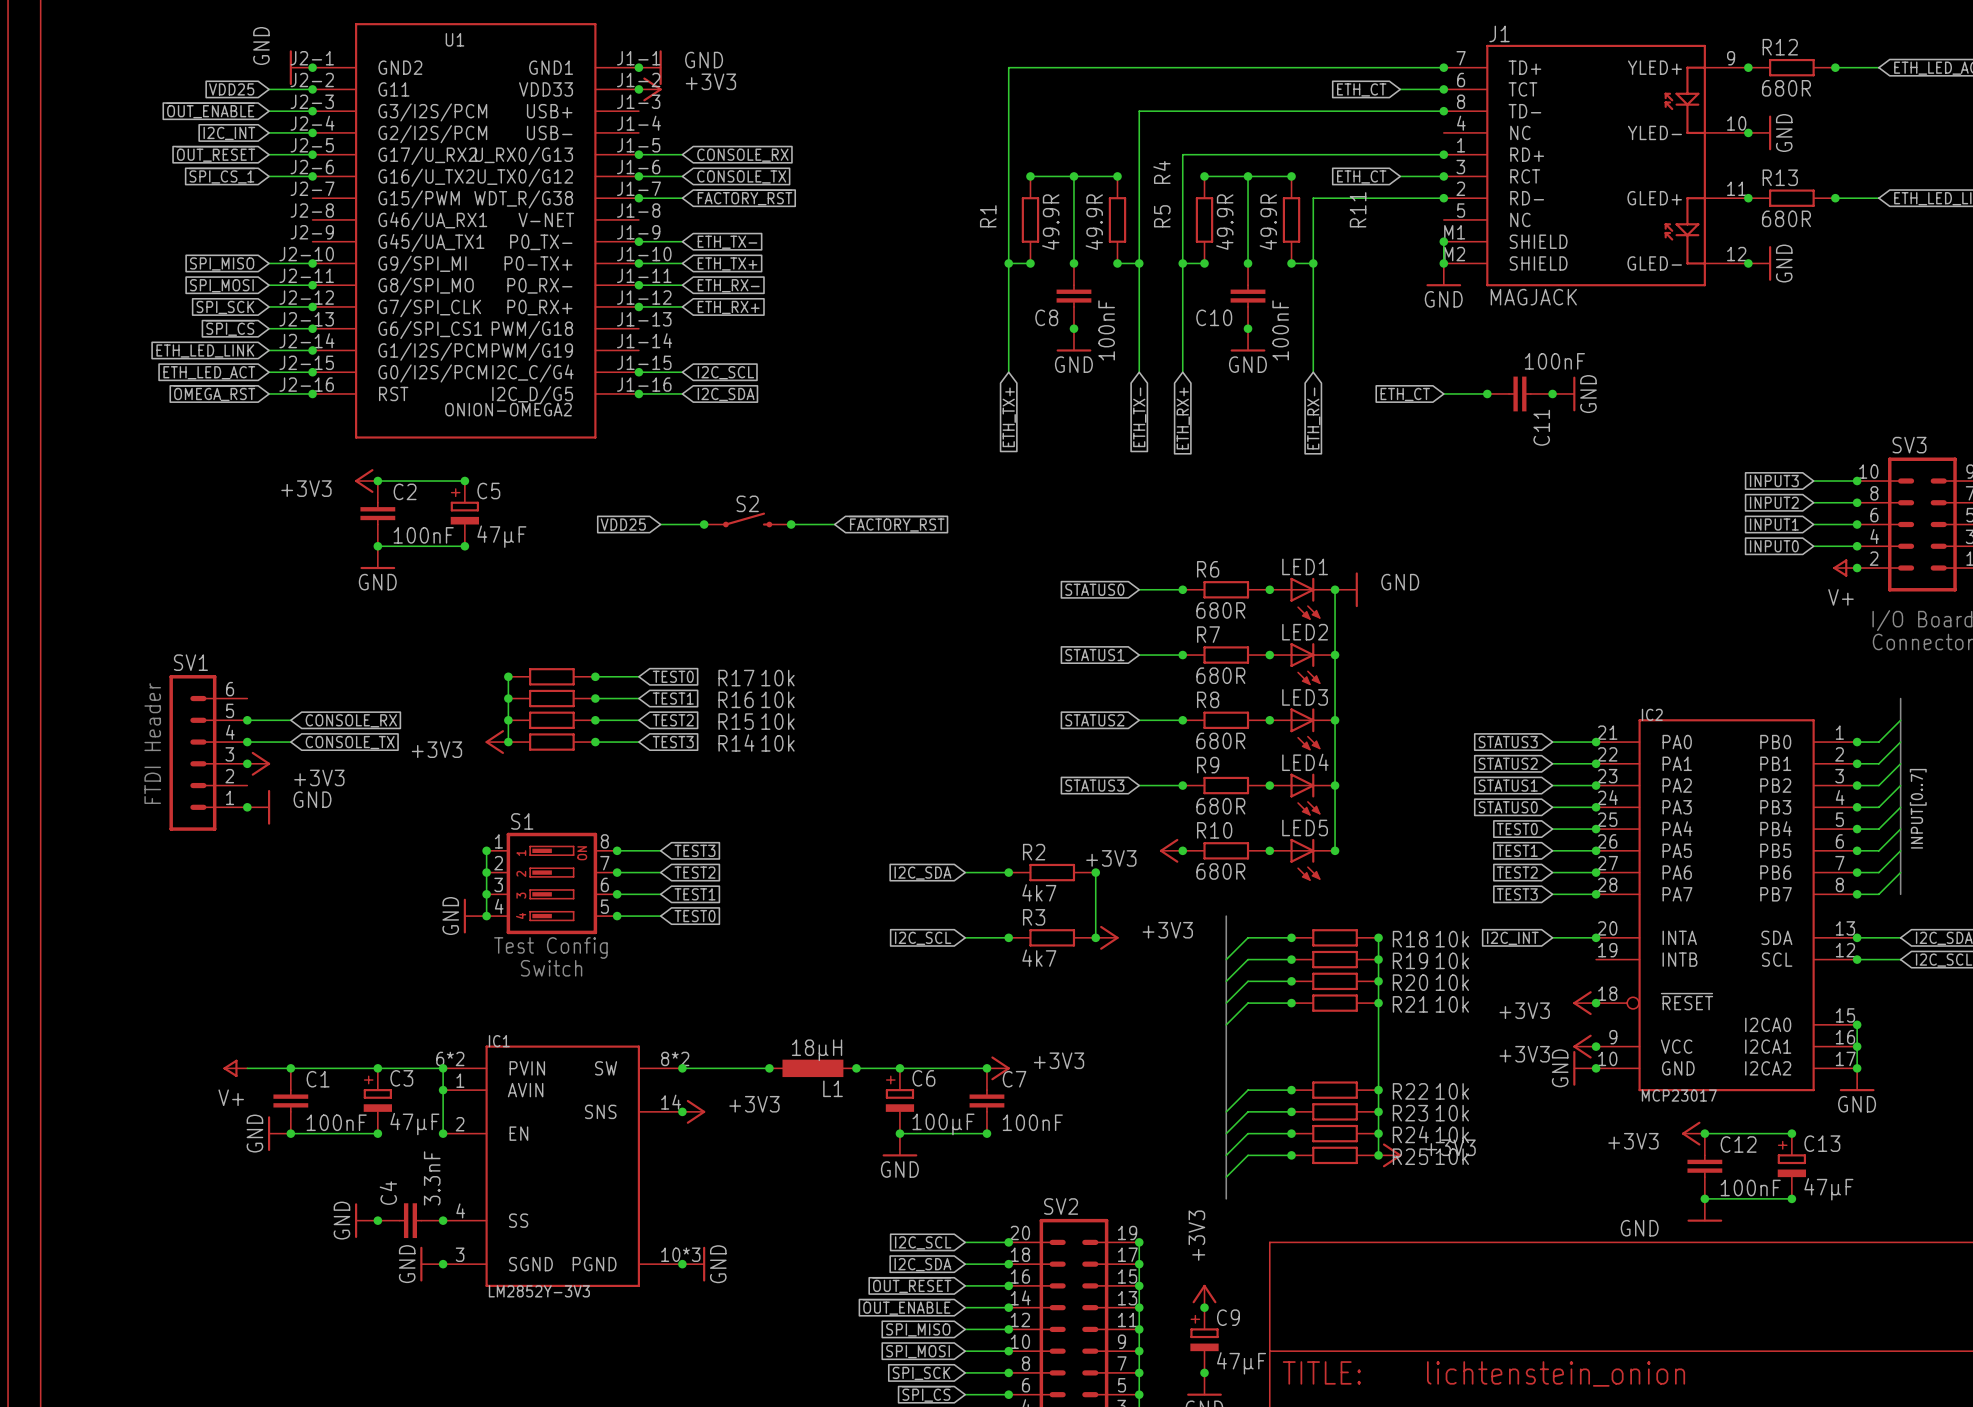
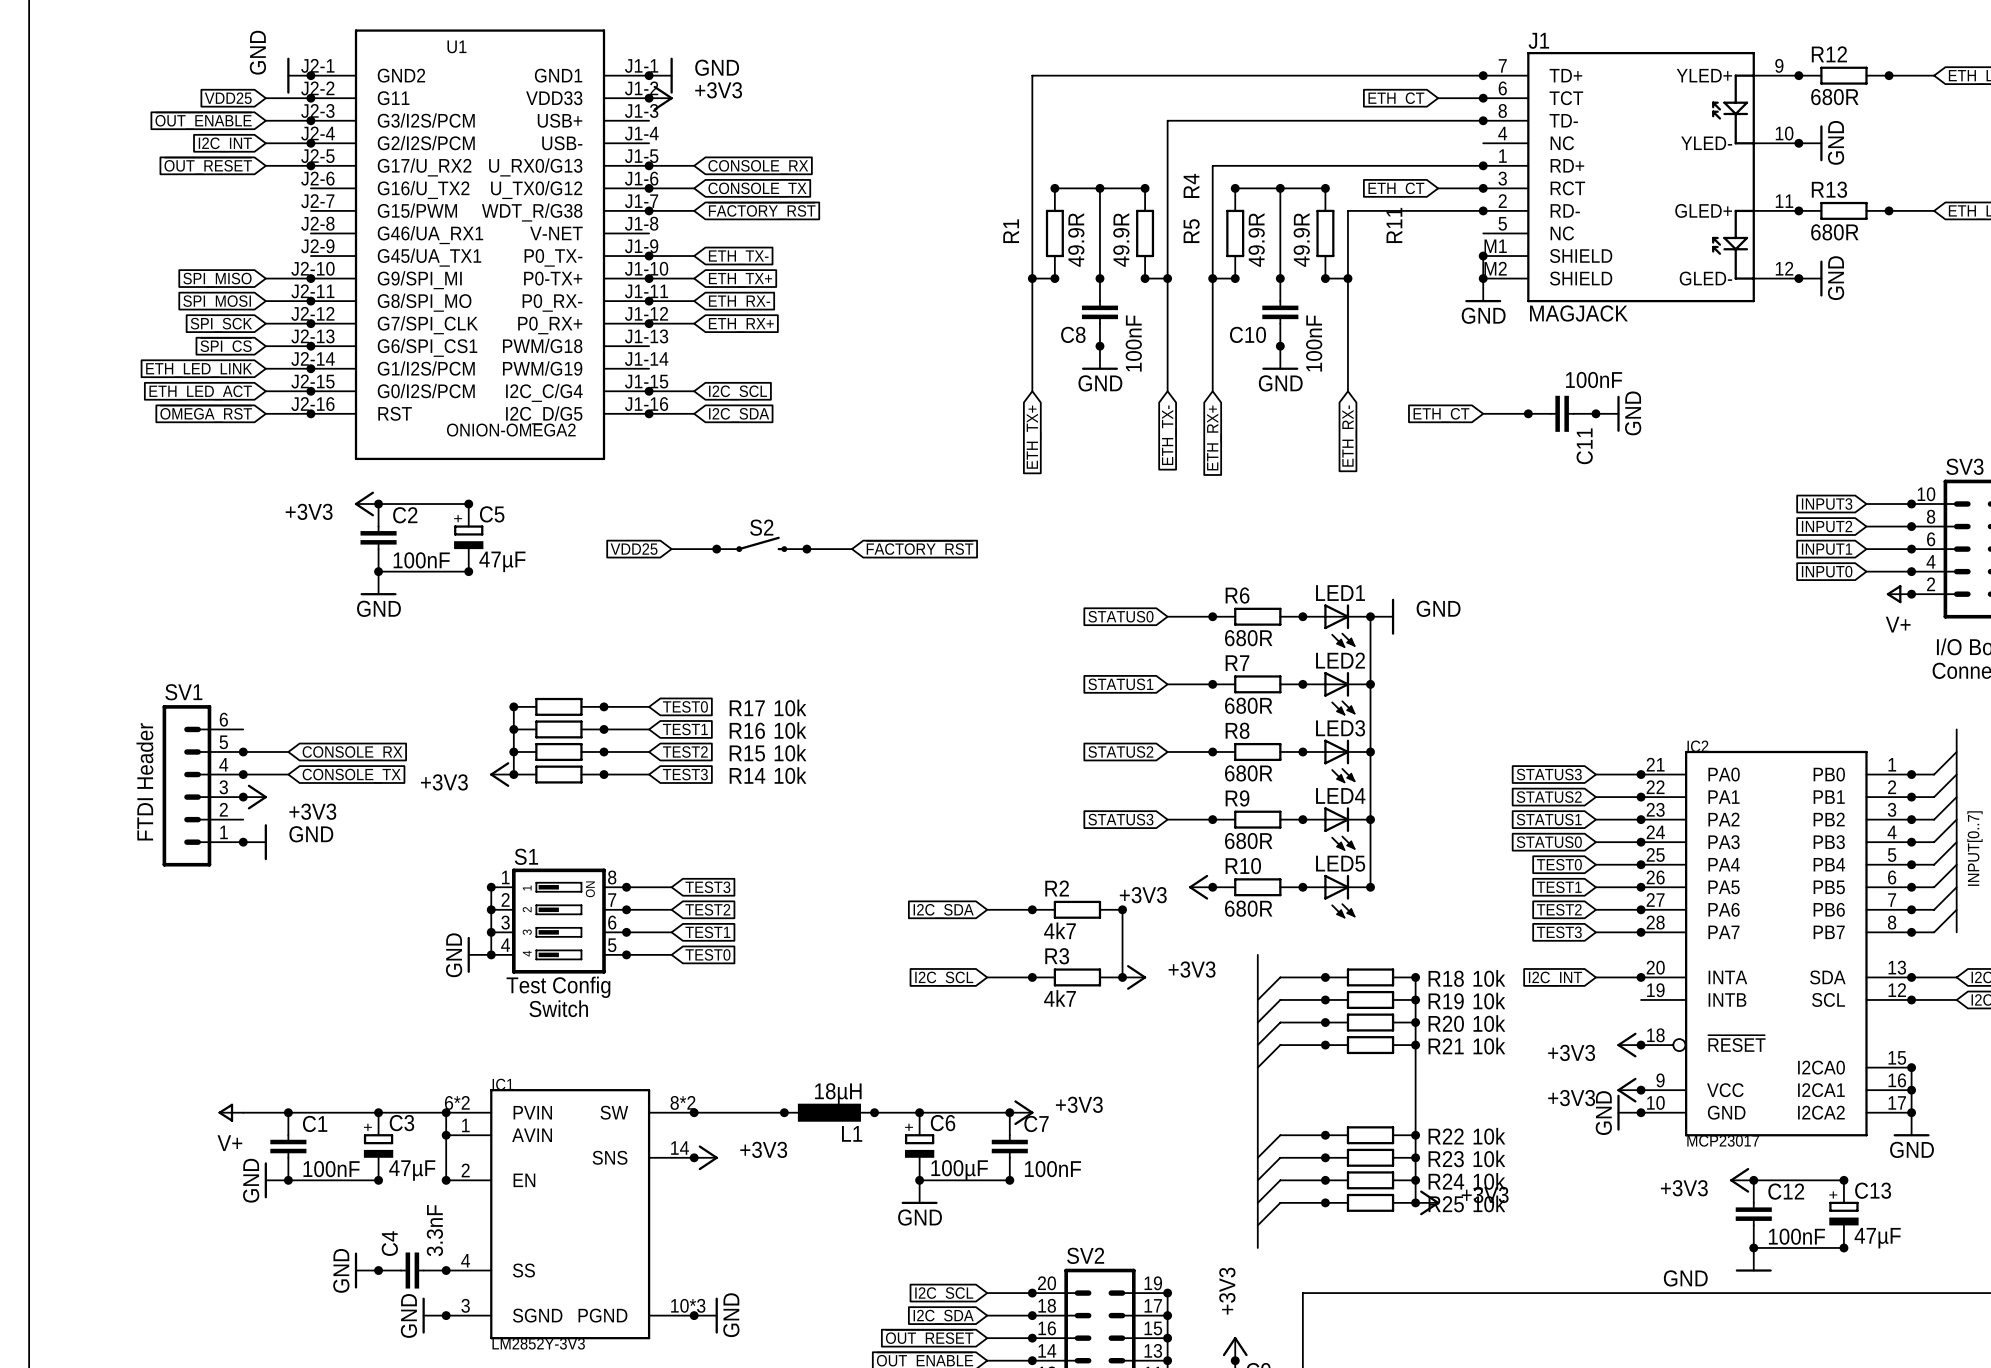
global label: ~{SPI_CS_1} (221, 175) -> none
wire: (269, 176) (312, 176) -> none
junction: (312, 176) -> none

